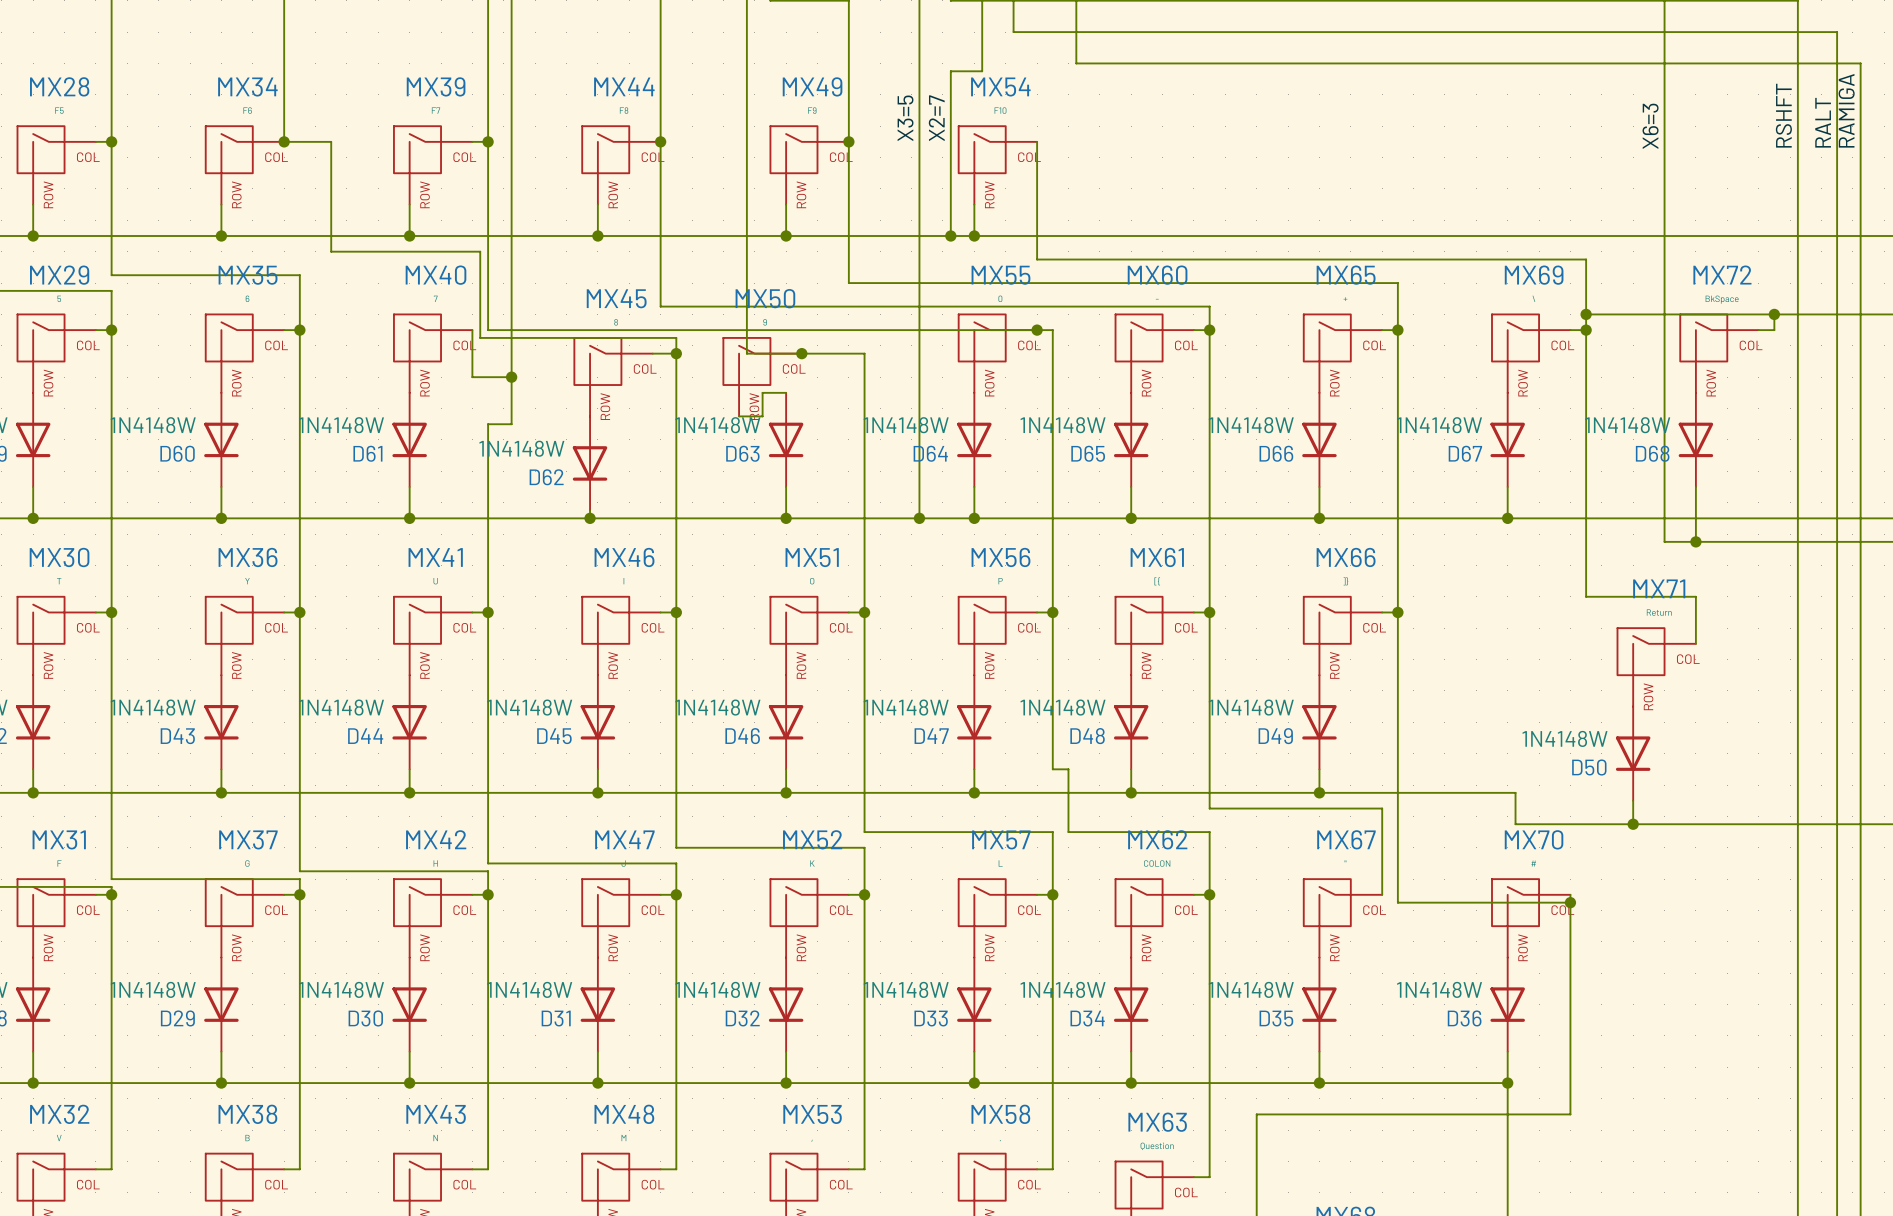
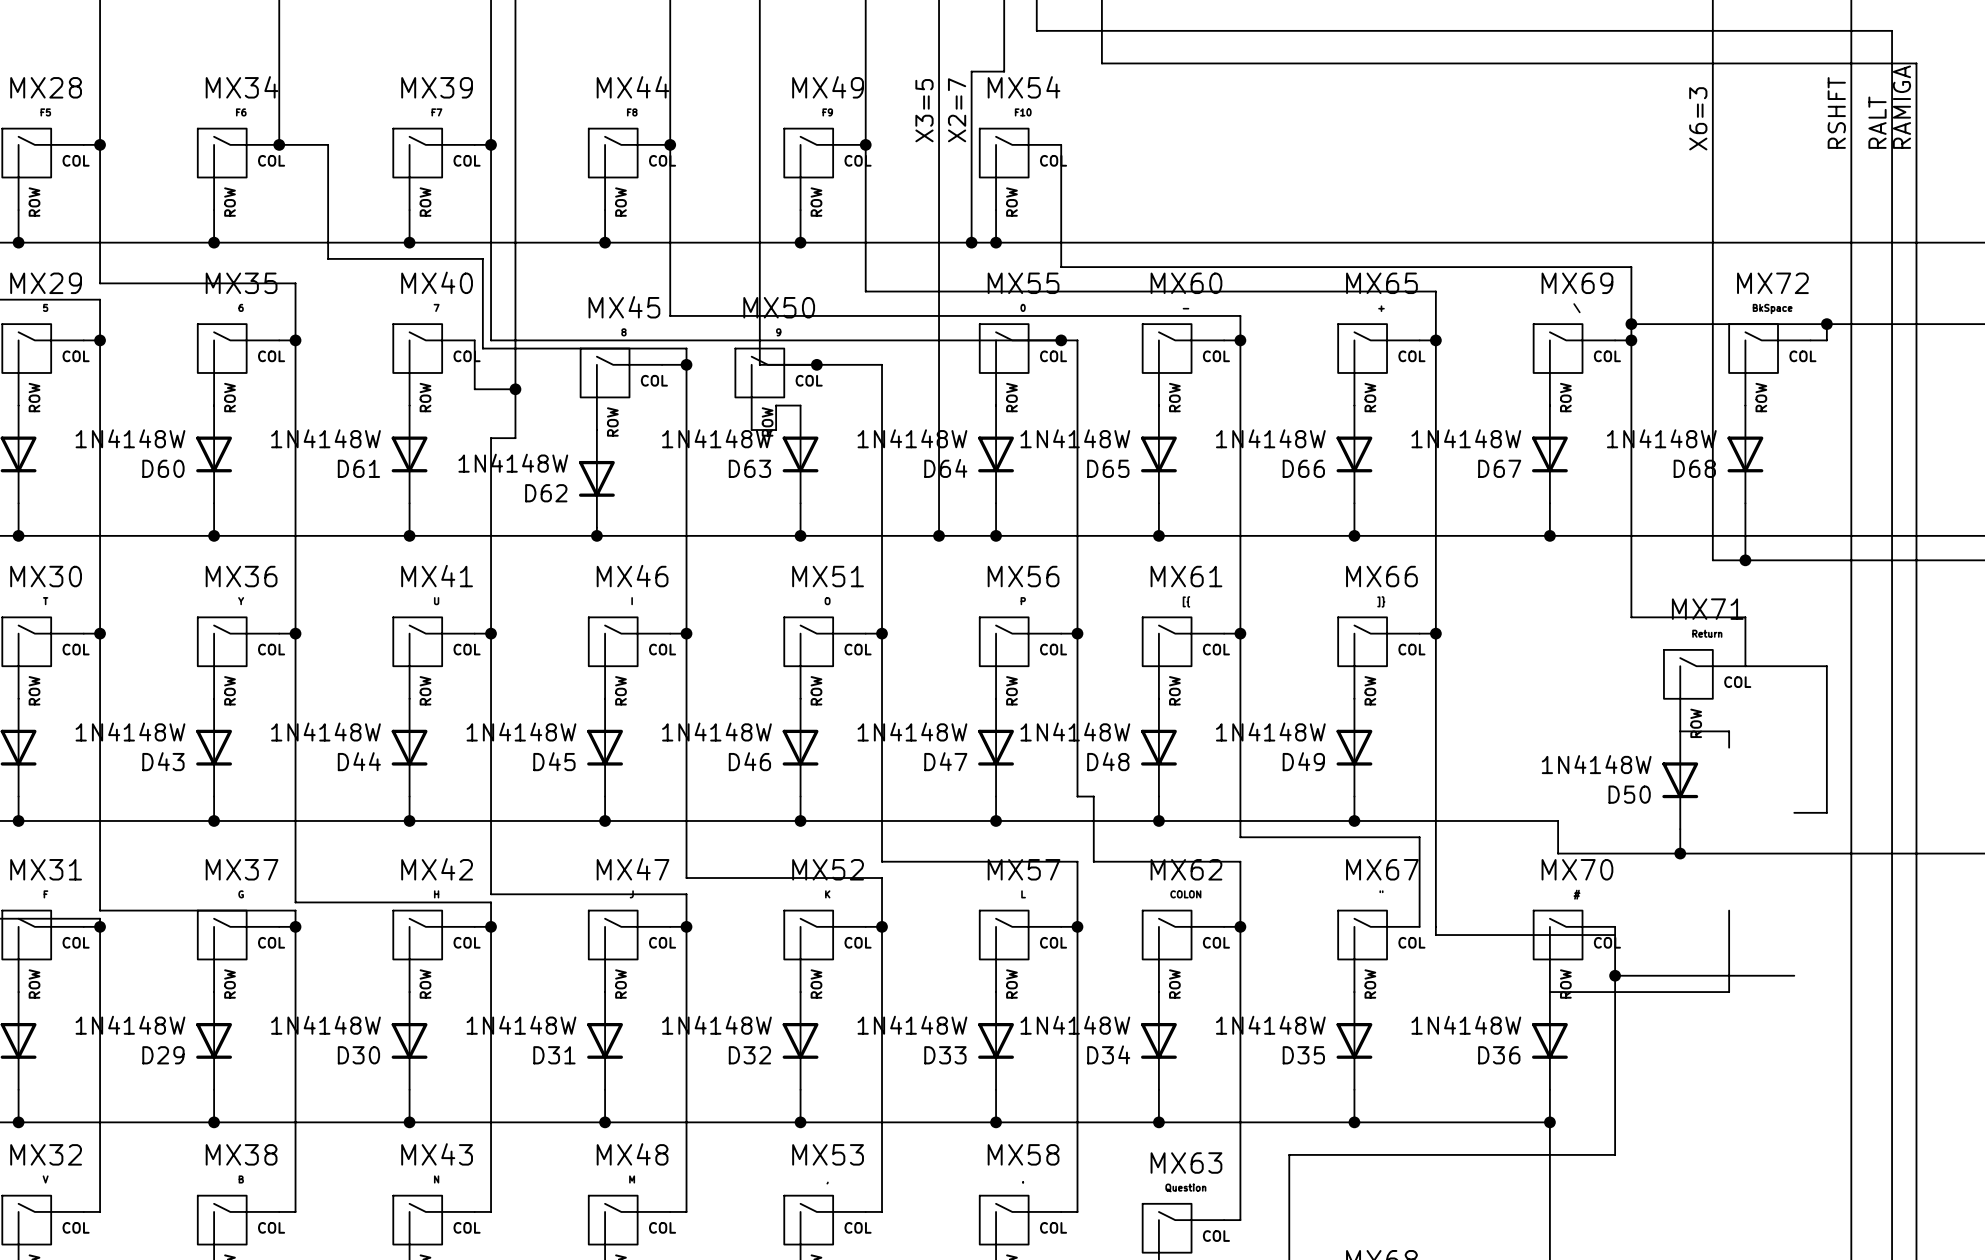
wire: none -> (1745, 666) (1826, 666) (1826, 812) (1794, 812)
wire: none -> (1680, 731) (1729, 731) (1729, 747)
wire: none -> (1729, 910) (1729, 992) (1549, 992)
junction position: (1570, 902) -> (1615, 975)
wire: none -> (1615, 975) (1794, 975)

